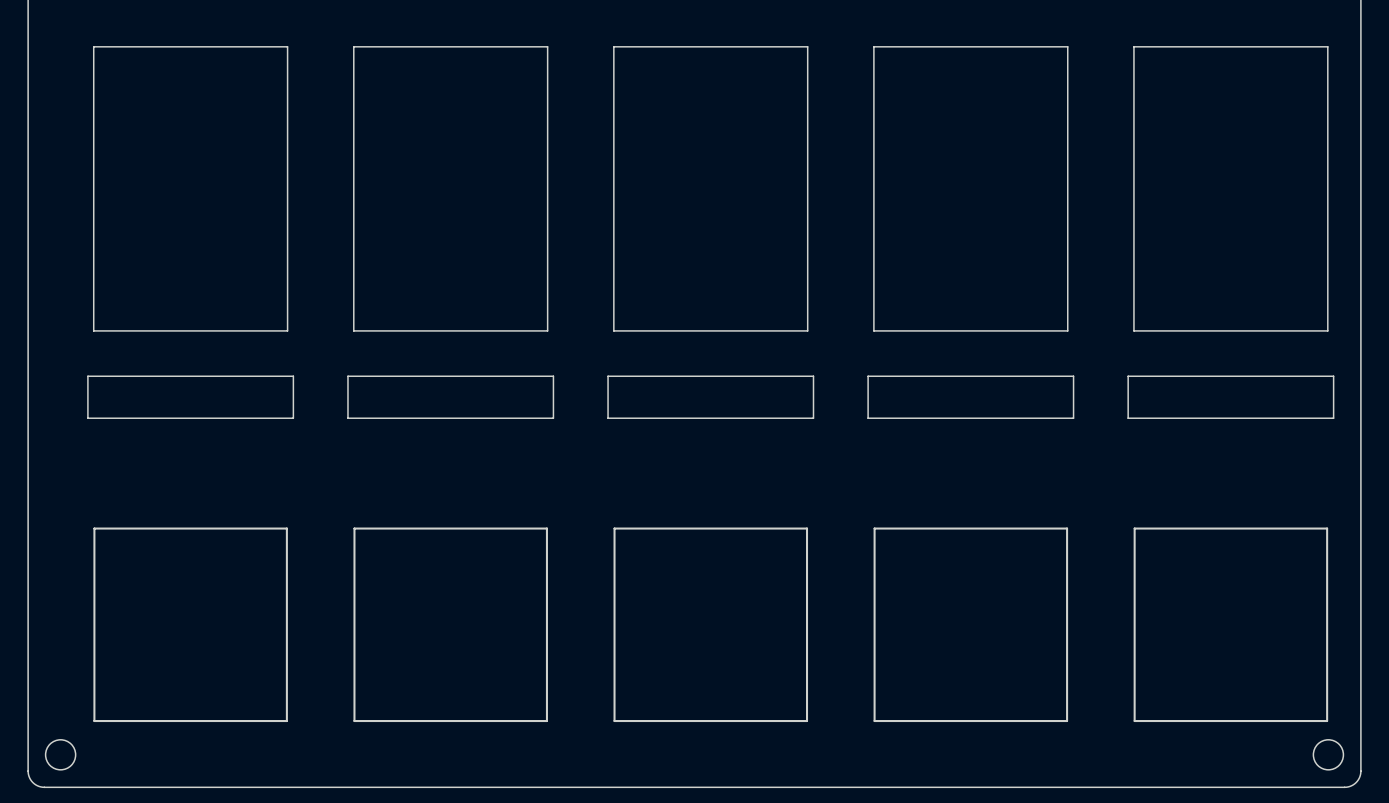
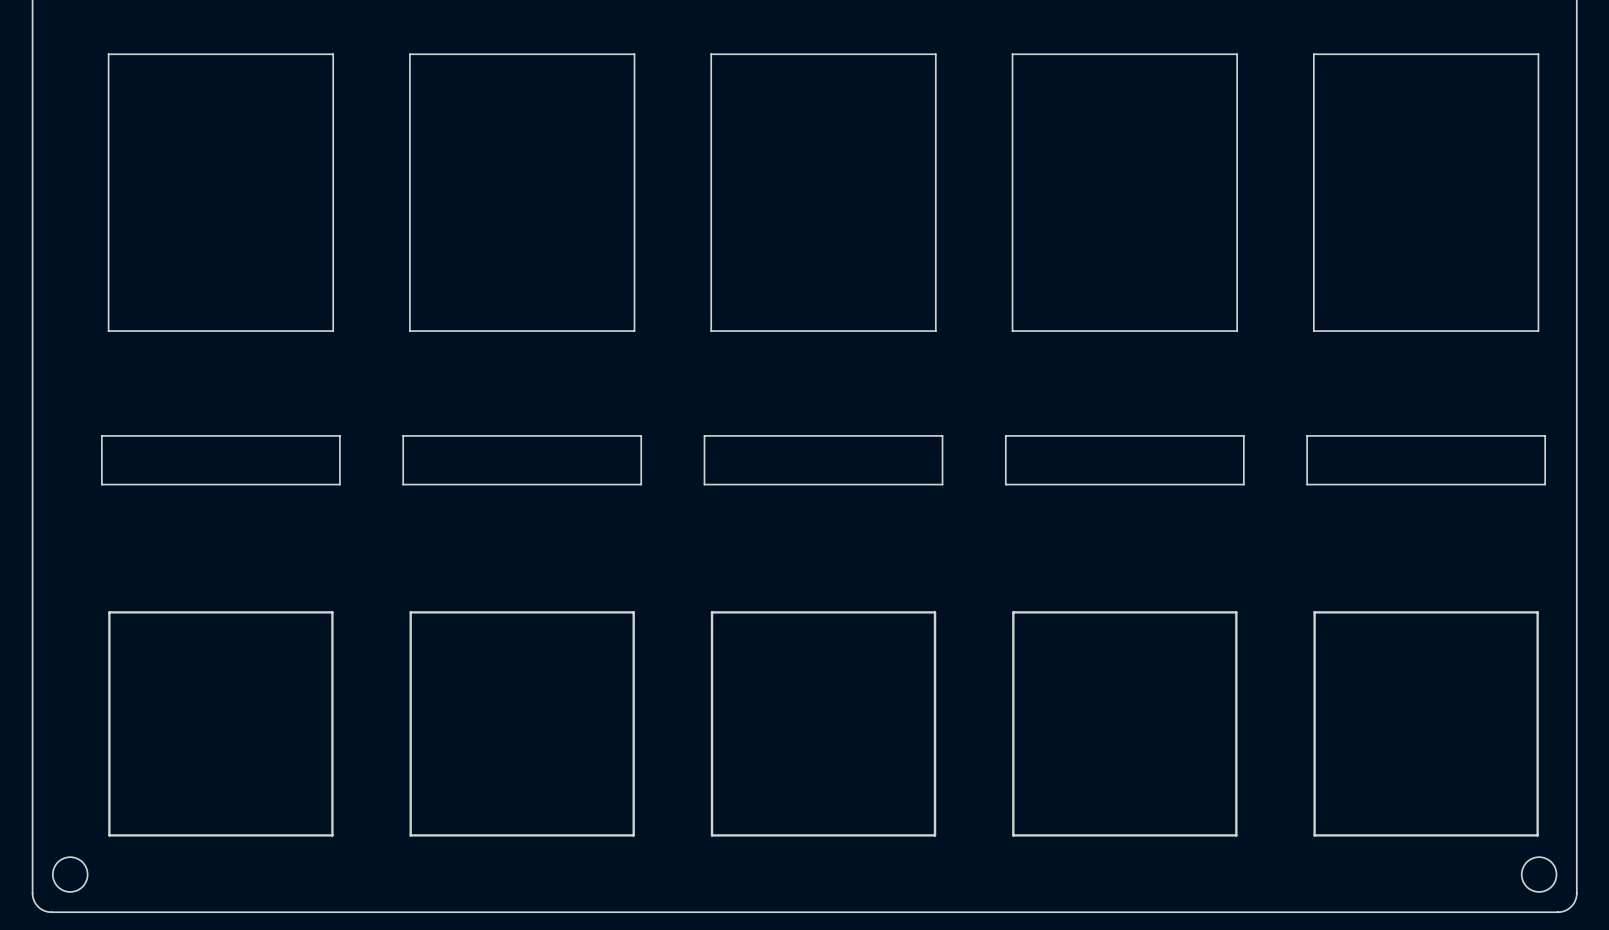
board edge: (93, 46) (287, 46) (287, 330) (93, 330) (93, 46) -> none
drawing: none -> [107, 53, 334, 332]
board edge: (353, 46) (547, 46) (547, 330) (353, 330) (353, 46) -> none
drawing: none -> [409, 53, 636, 332]
board edge: (613, 46) (807, 46) (807, 330) (613, 330) (613, 46) -> none
drawing: none -> [710, 53, 937, 332]
board edge: (873, 46) (1067, 46) (1067, 330) (873, 330) (873, 46) -> none
drawing: none -> [1011, 53, 1238, 332]
board edge: (1133, 46) (1327, 46) (1327, 330) (1133, 330) (1133, 46) -> none
drawing: none -> [1313, 53, 1540, 332]

